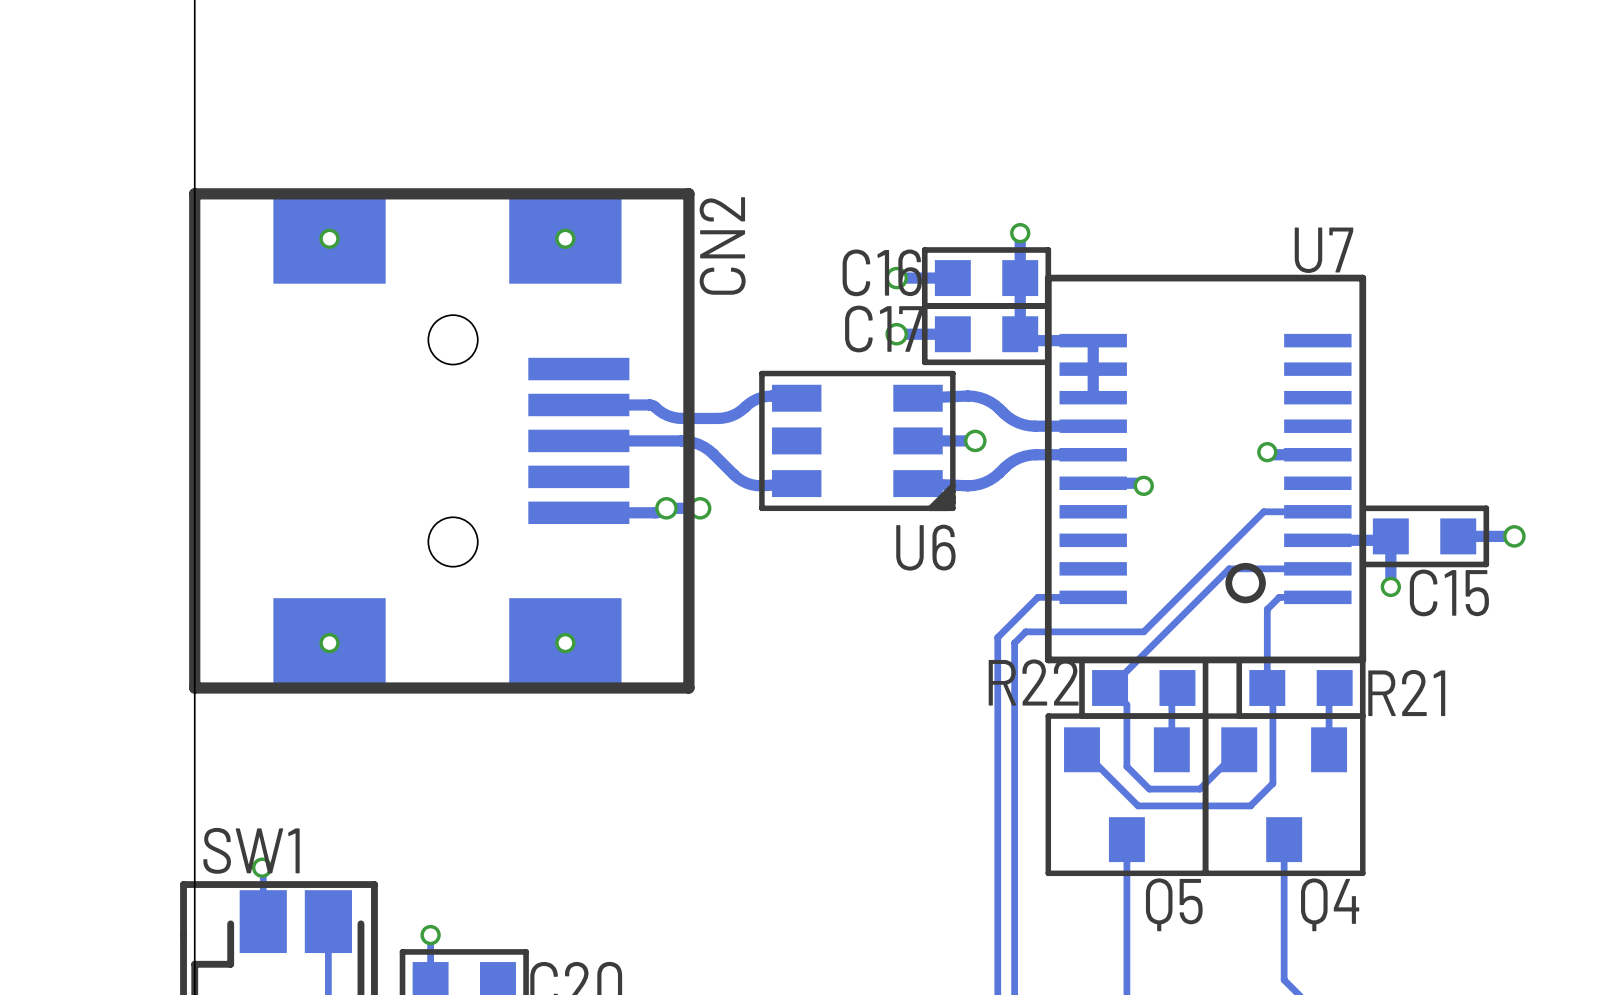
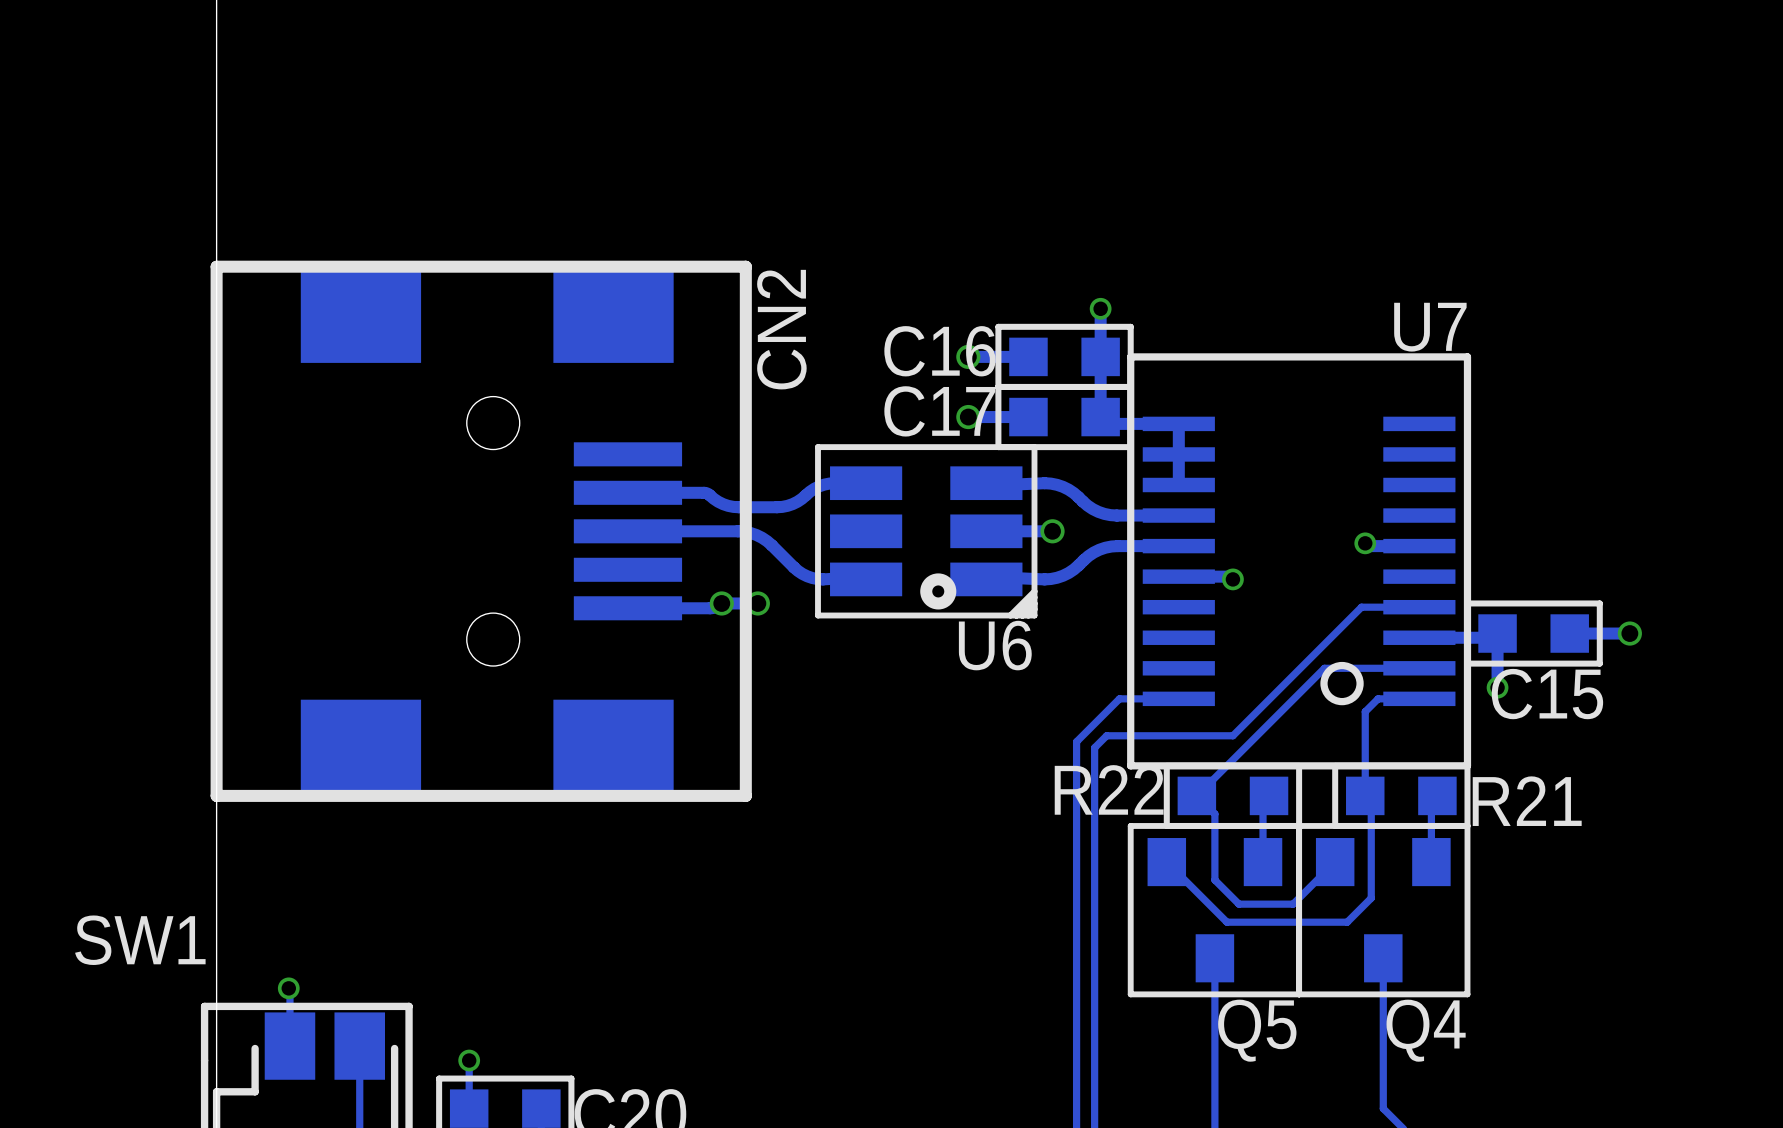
via: (329, 238) -> none
via: (565, 238) -> none
U6 footprint: [759, 370, 956, 512] -> [815, 444, 1038, 619]
via: (329, 643) -> none
via: (565, 643) -> none
SW1 name position: SW1 (251, 850) -> SW1 (140, 940)

